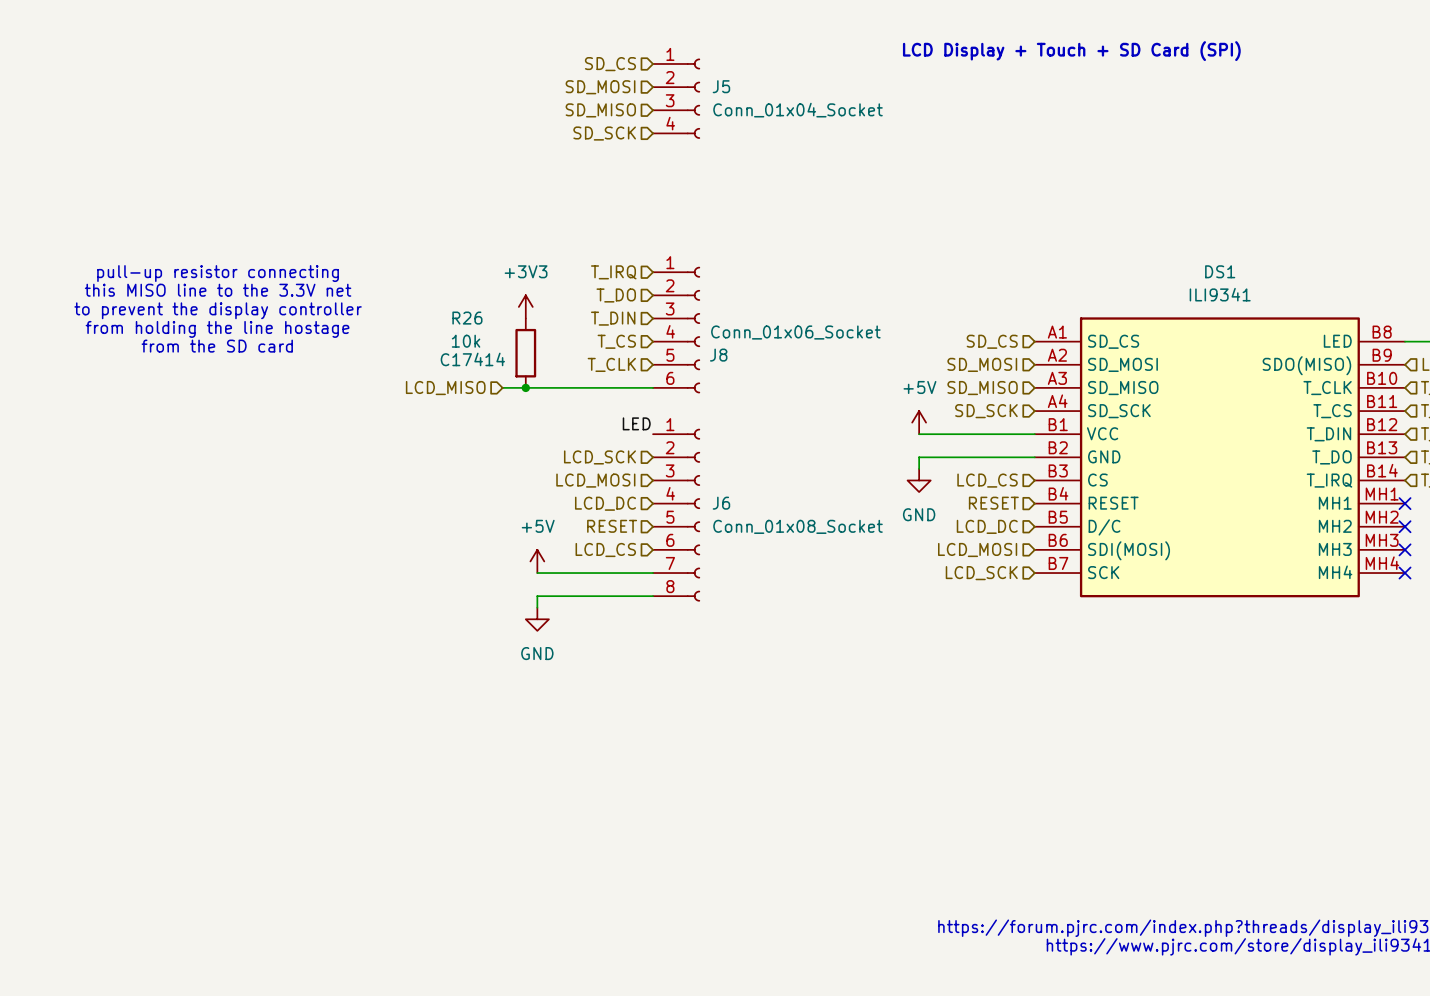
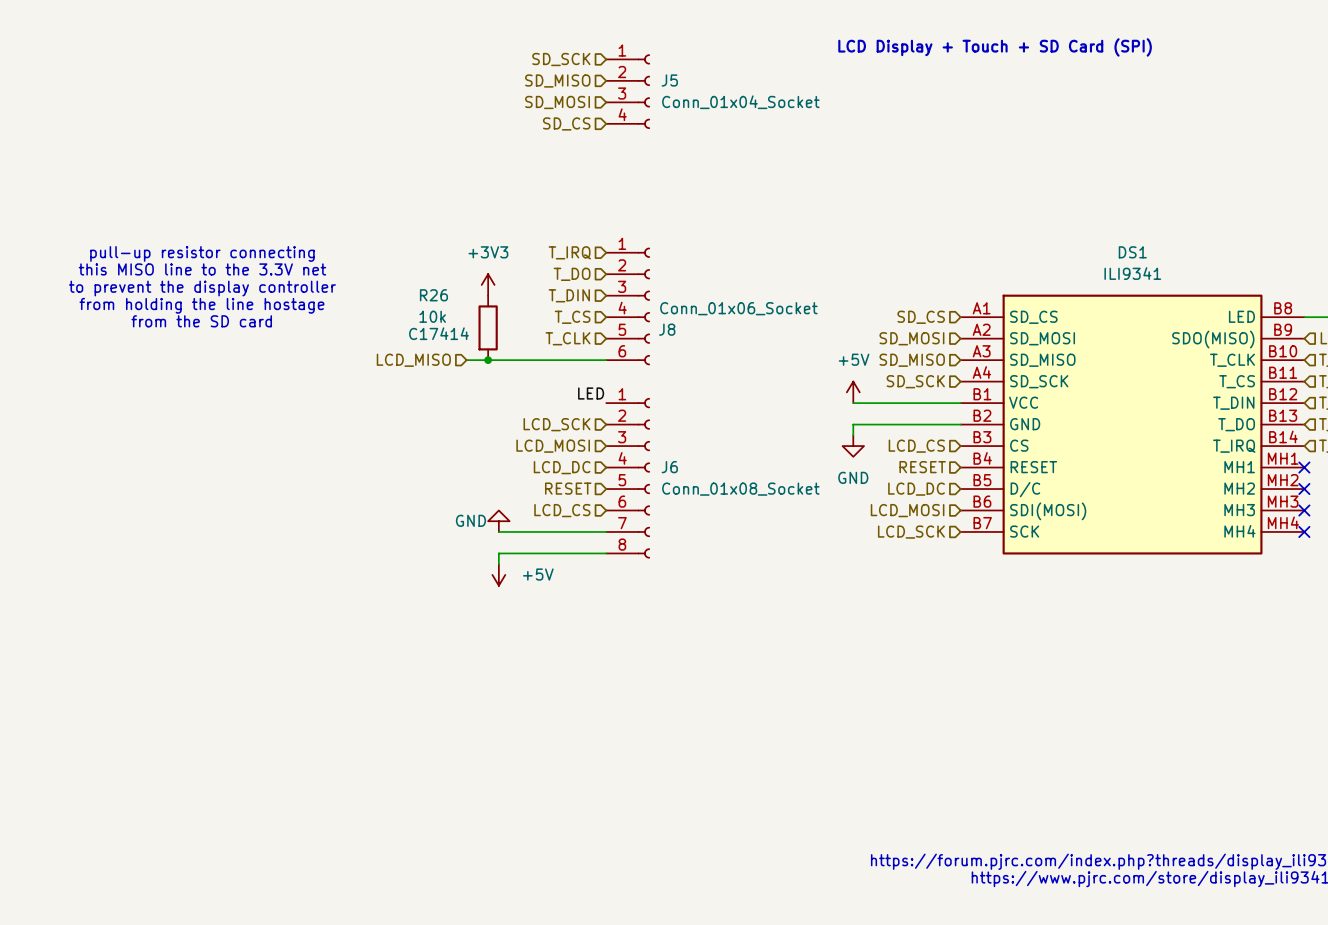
hierarchical label: SD_CS (610, 64) -> SD_SCK (561, 59)
hierarchical label: SD_MOSI (600, 87) -> SD_MISO (557, 81)
hierarchical label: SD_MISO (600, 110) -> SD_MOSI (557, 102)
hierarchical label: SD_SCK (604, 133) -> SD_CS (566, 123)
power symbol: +5V (537, 561) -> GND (498, 521)
power symbol: GND (537, 619) -> +5V (498, 574)

